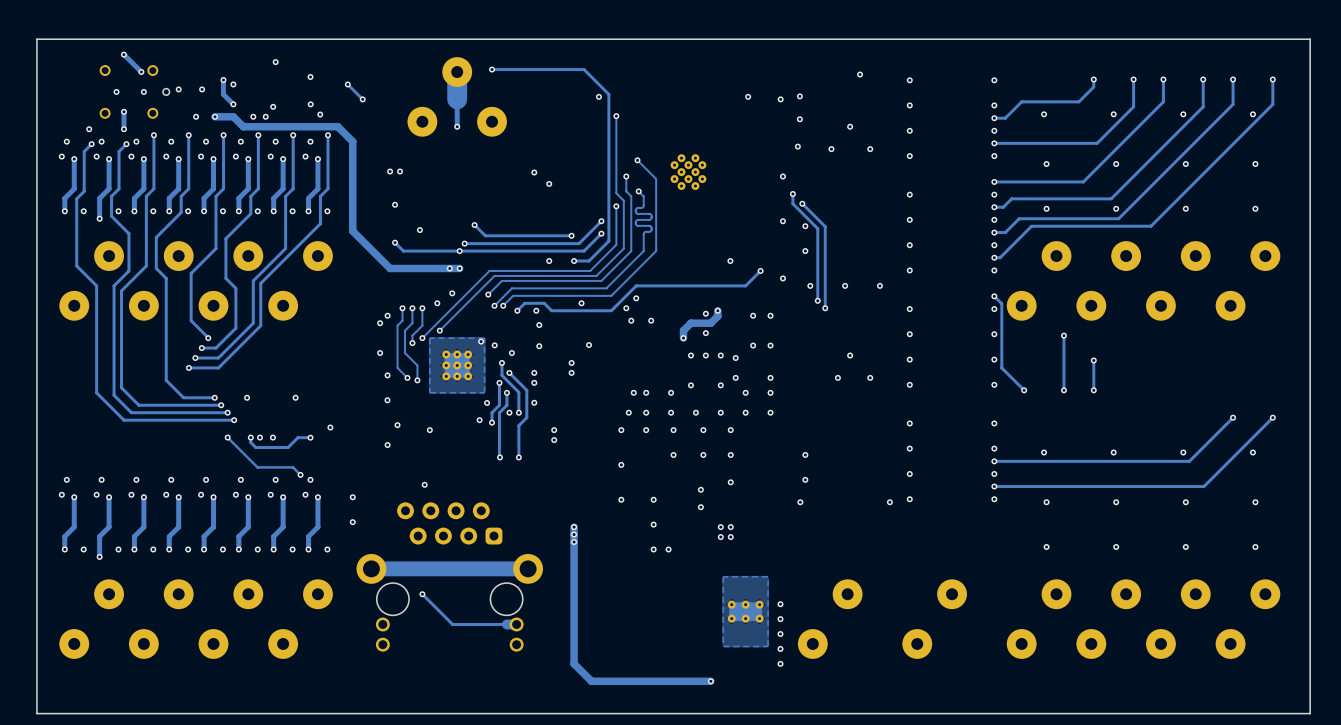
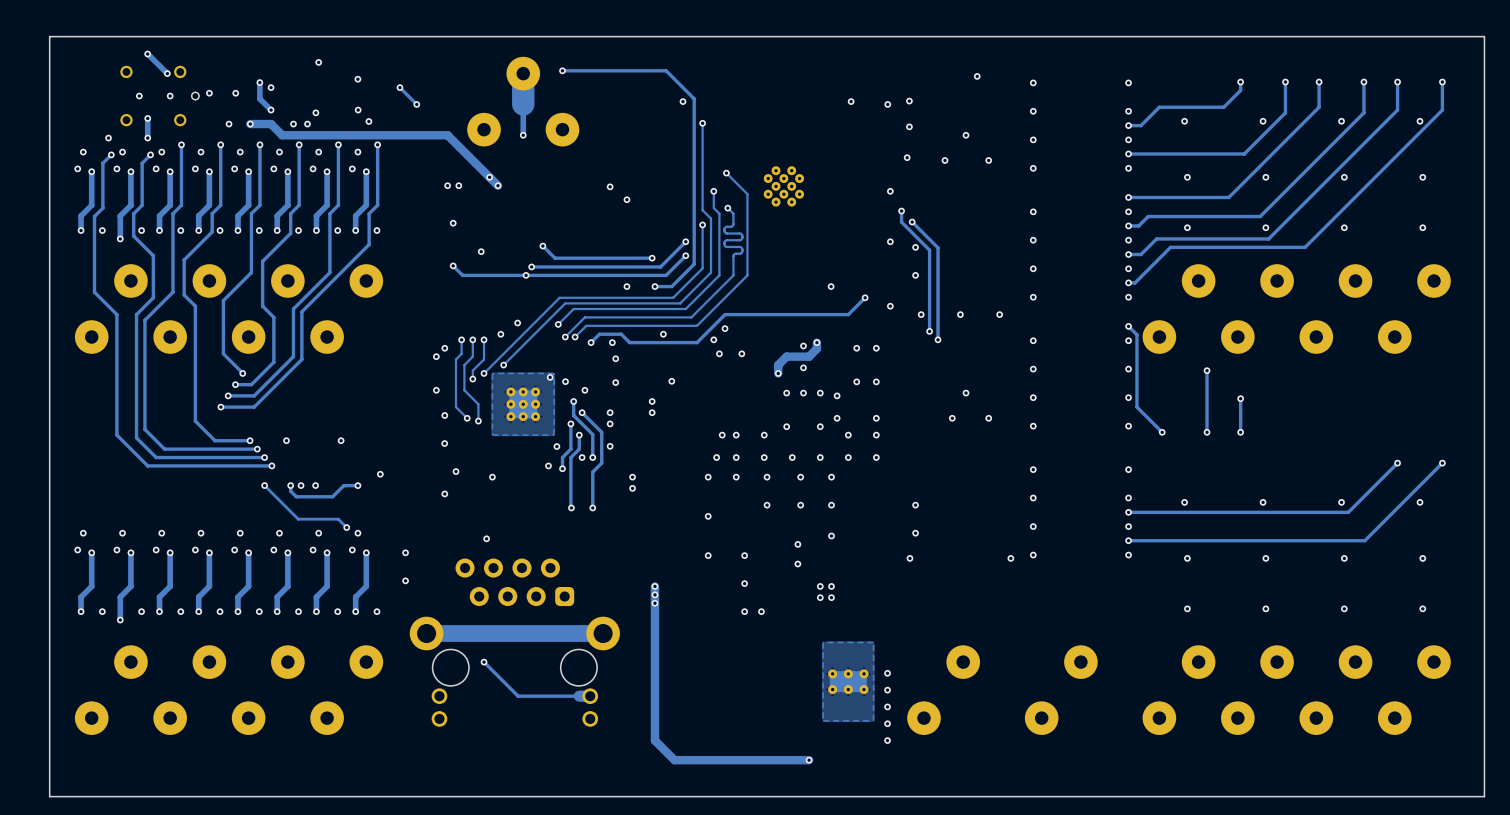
track: (337, 126) (352, 141) (352, 231) (390, 268) (459, 268) -> (388, 135) (447, 135) (498, 185)
via: none -> (489, 177)
via: none -> (498, 185)
via: (449, 268) -> none
via: (459, 268) -> none

